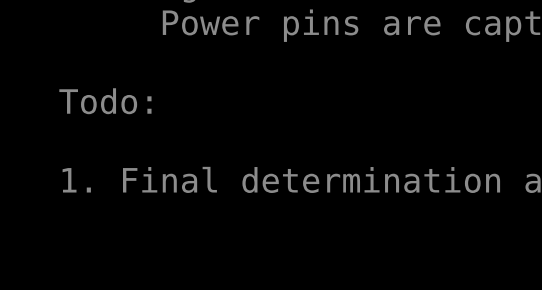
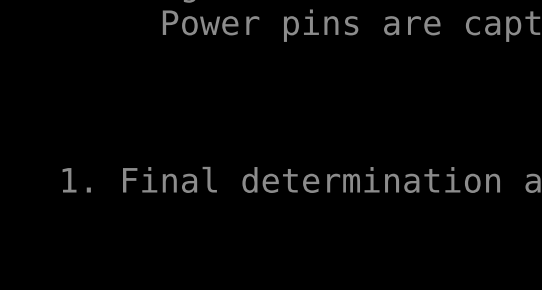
text: Todo: (105, 101) -> none

